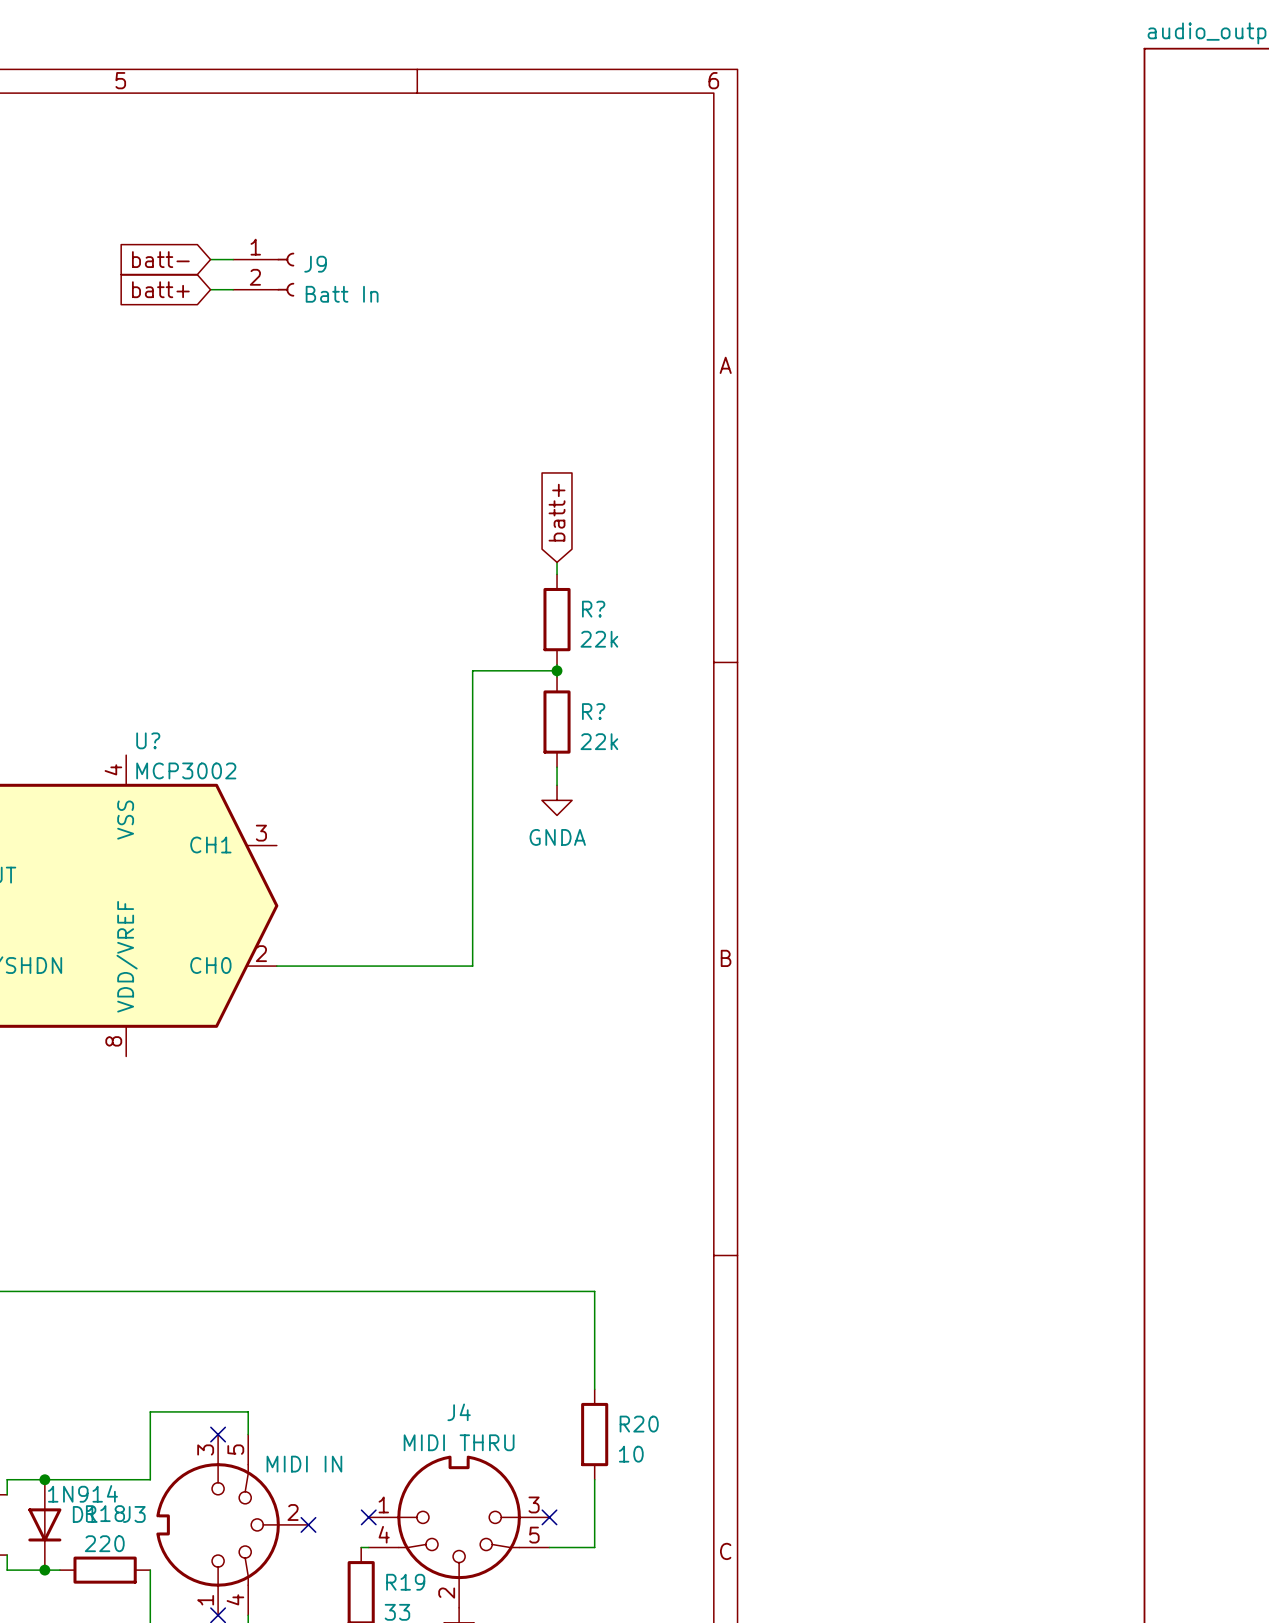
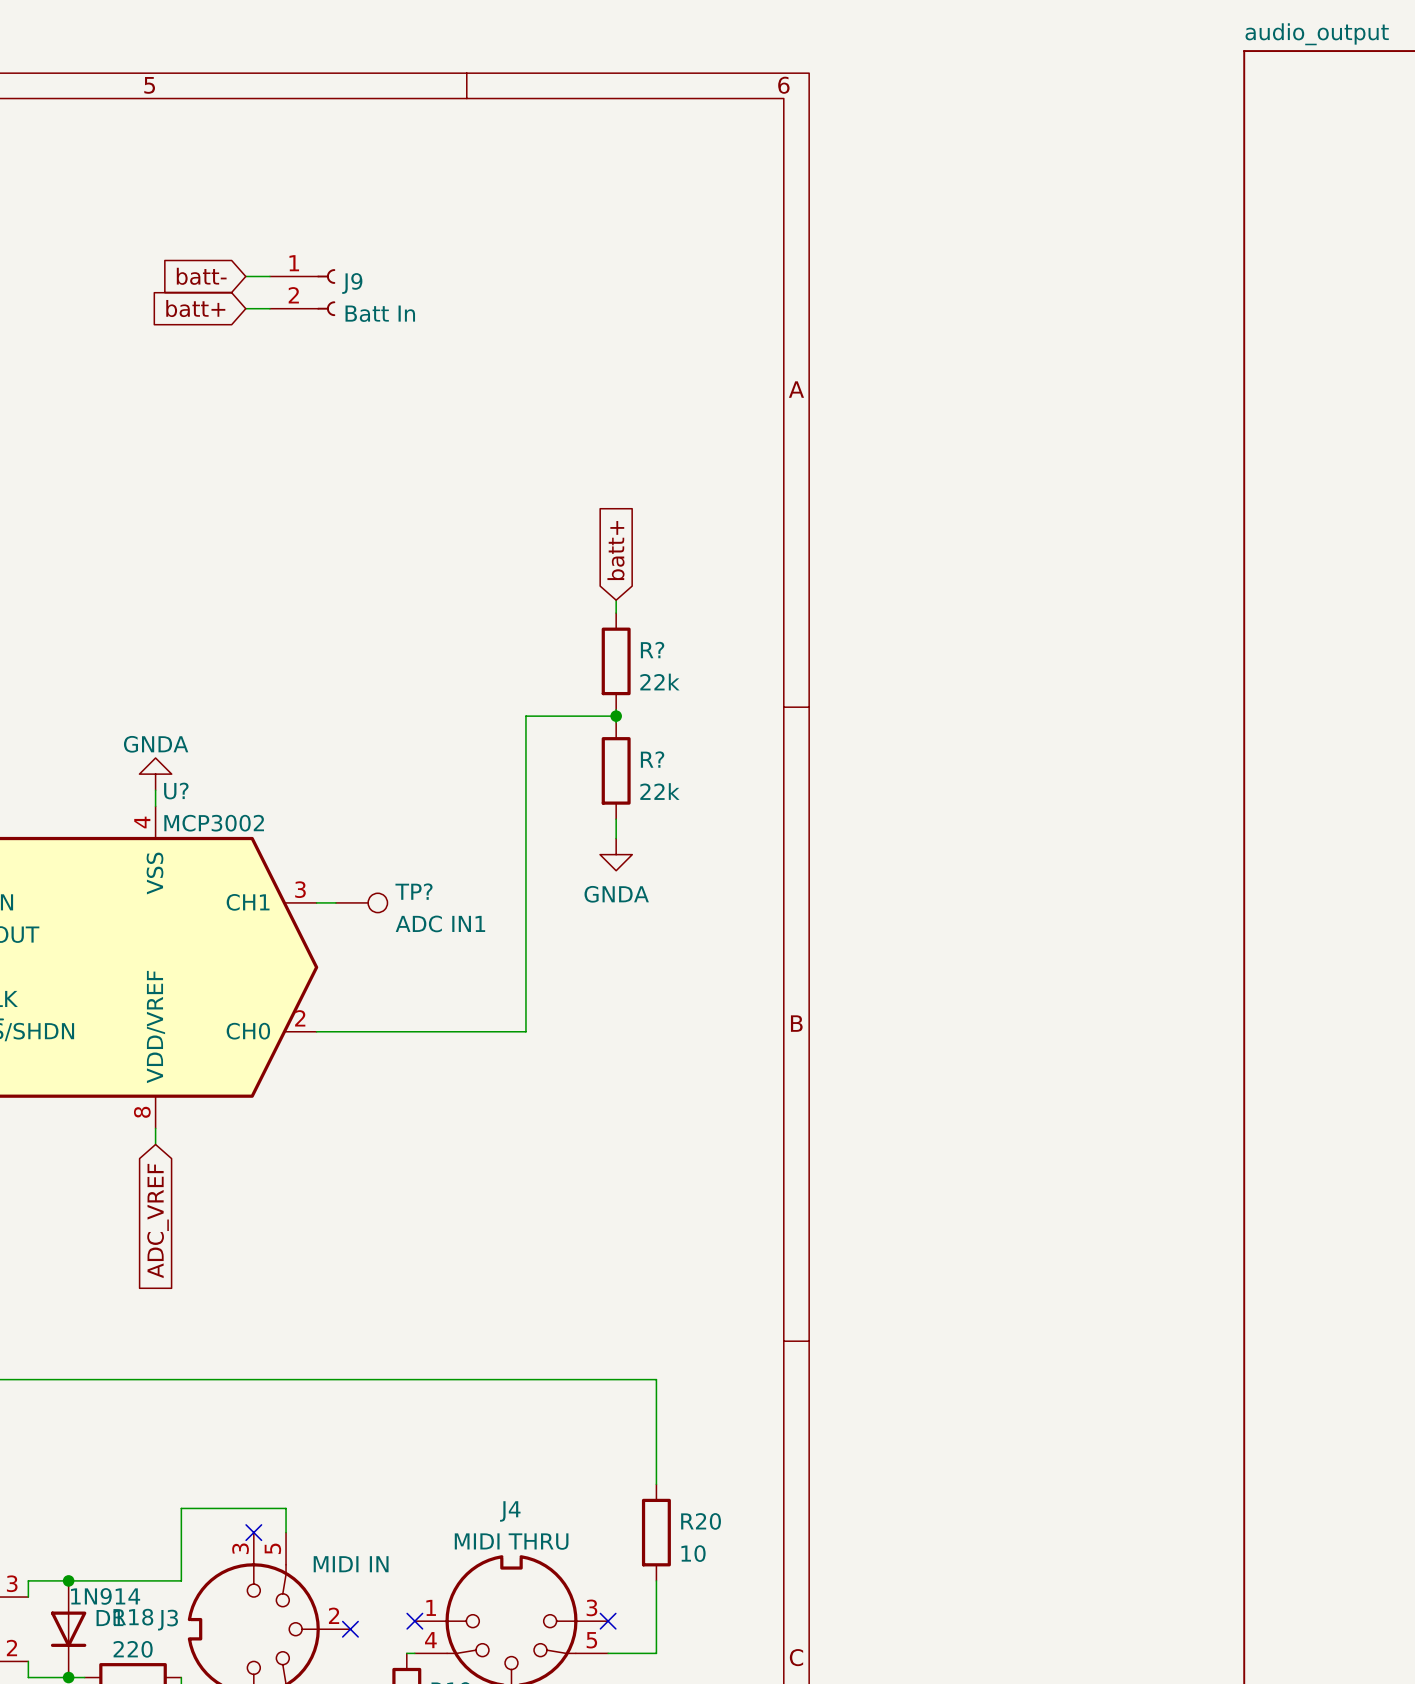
power symbol: none -> GNDA (155, 774)
wire: none -> (155, 790) (155, 806)
wire: none -> (316, 902) (335, 902)
TP?: none -> ADC IN1 (361, 902)
wire: none -> (155, 1128) (155, 1144)
global label: none -> ADC_VREF (158, 1221)

